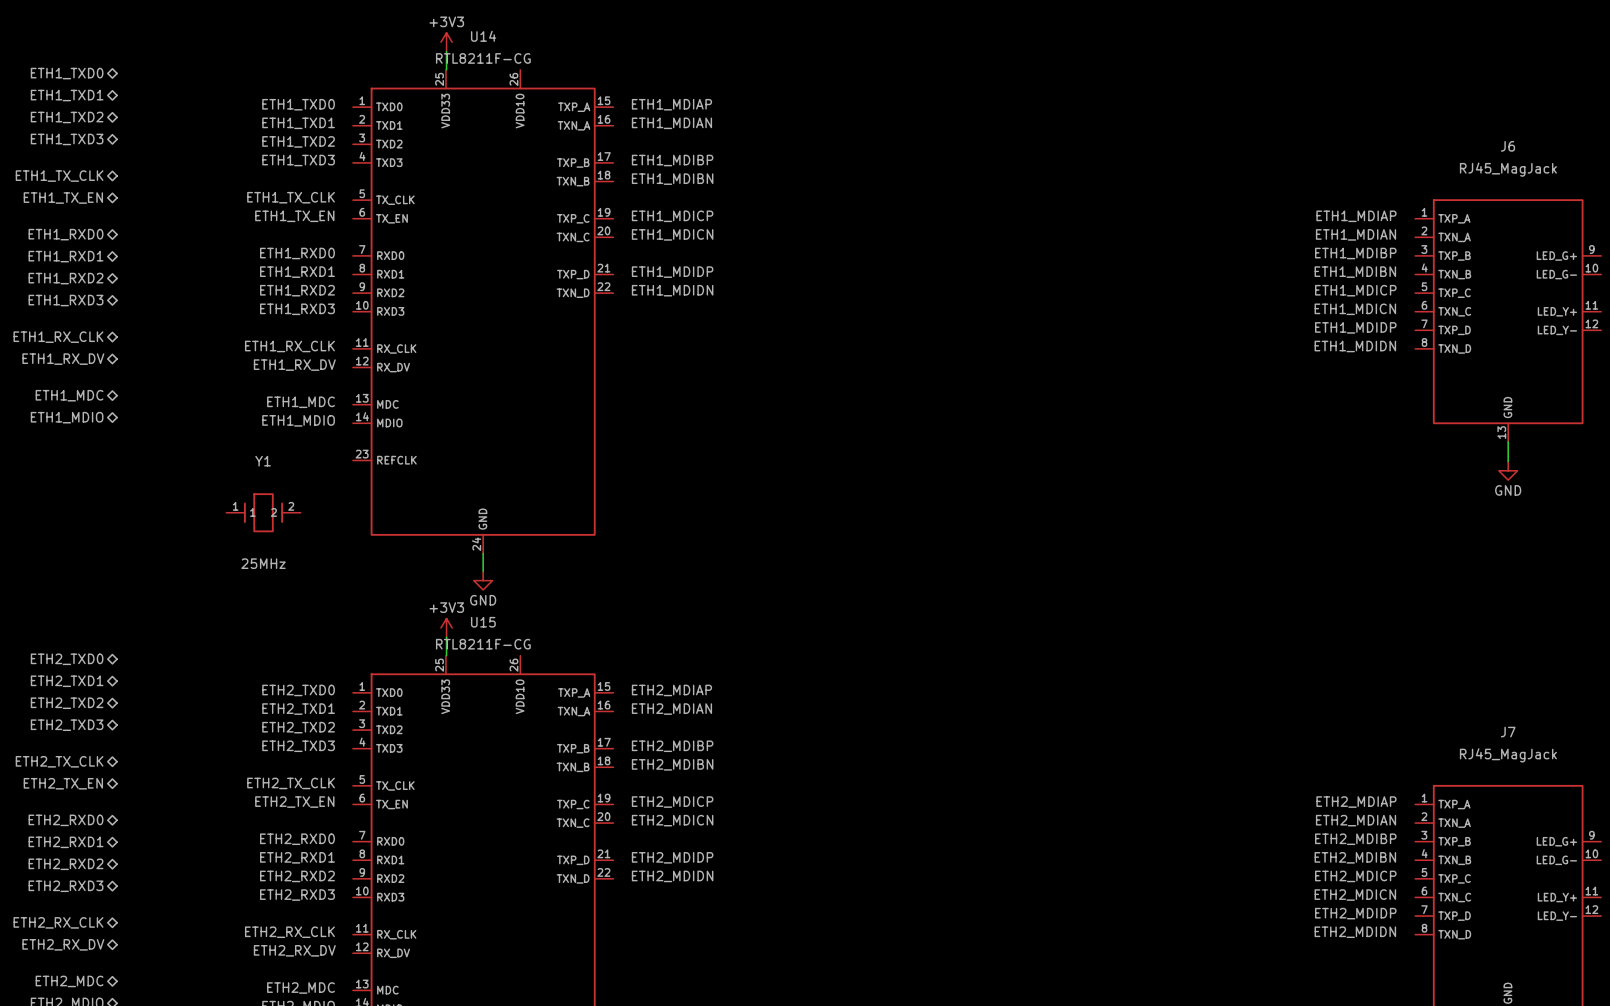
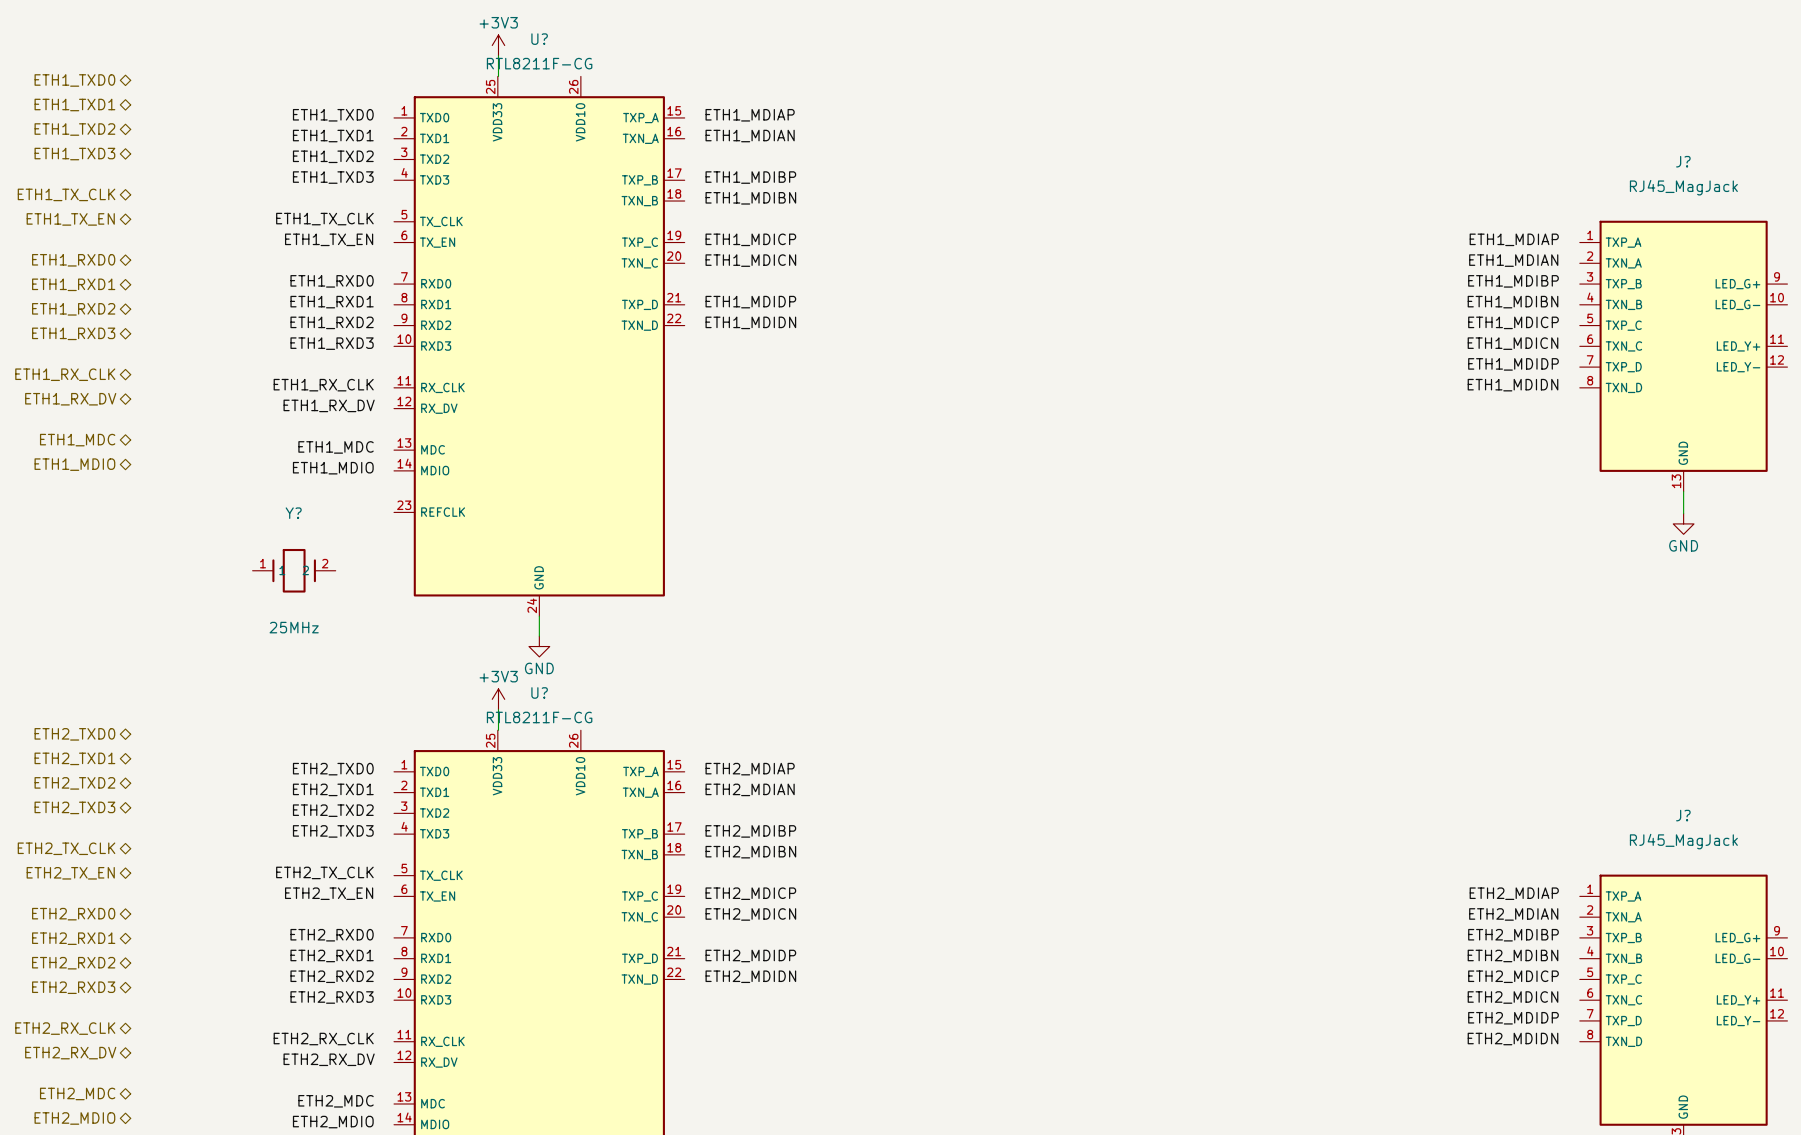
U14 name: U14 (483, 36) -> U? (539, 39)
J6 name: J6 (1507, 146) -> J? (1683, 161)
Y1 name: Y1 (263, 461) -> Y? (293, 513)
U15 name: U15 (483, 622) -> U? (539, 692)
J7 name: J7 (1508, 732) -> J? (1683, 815)

